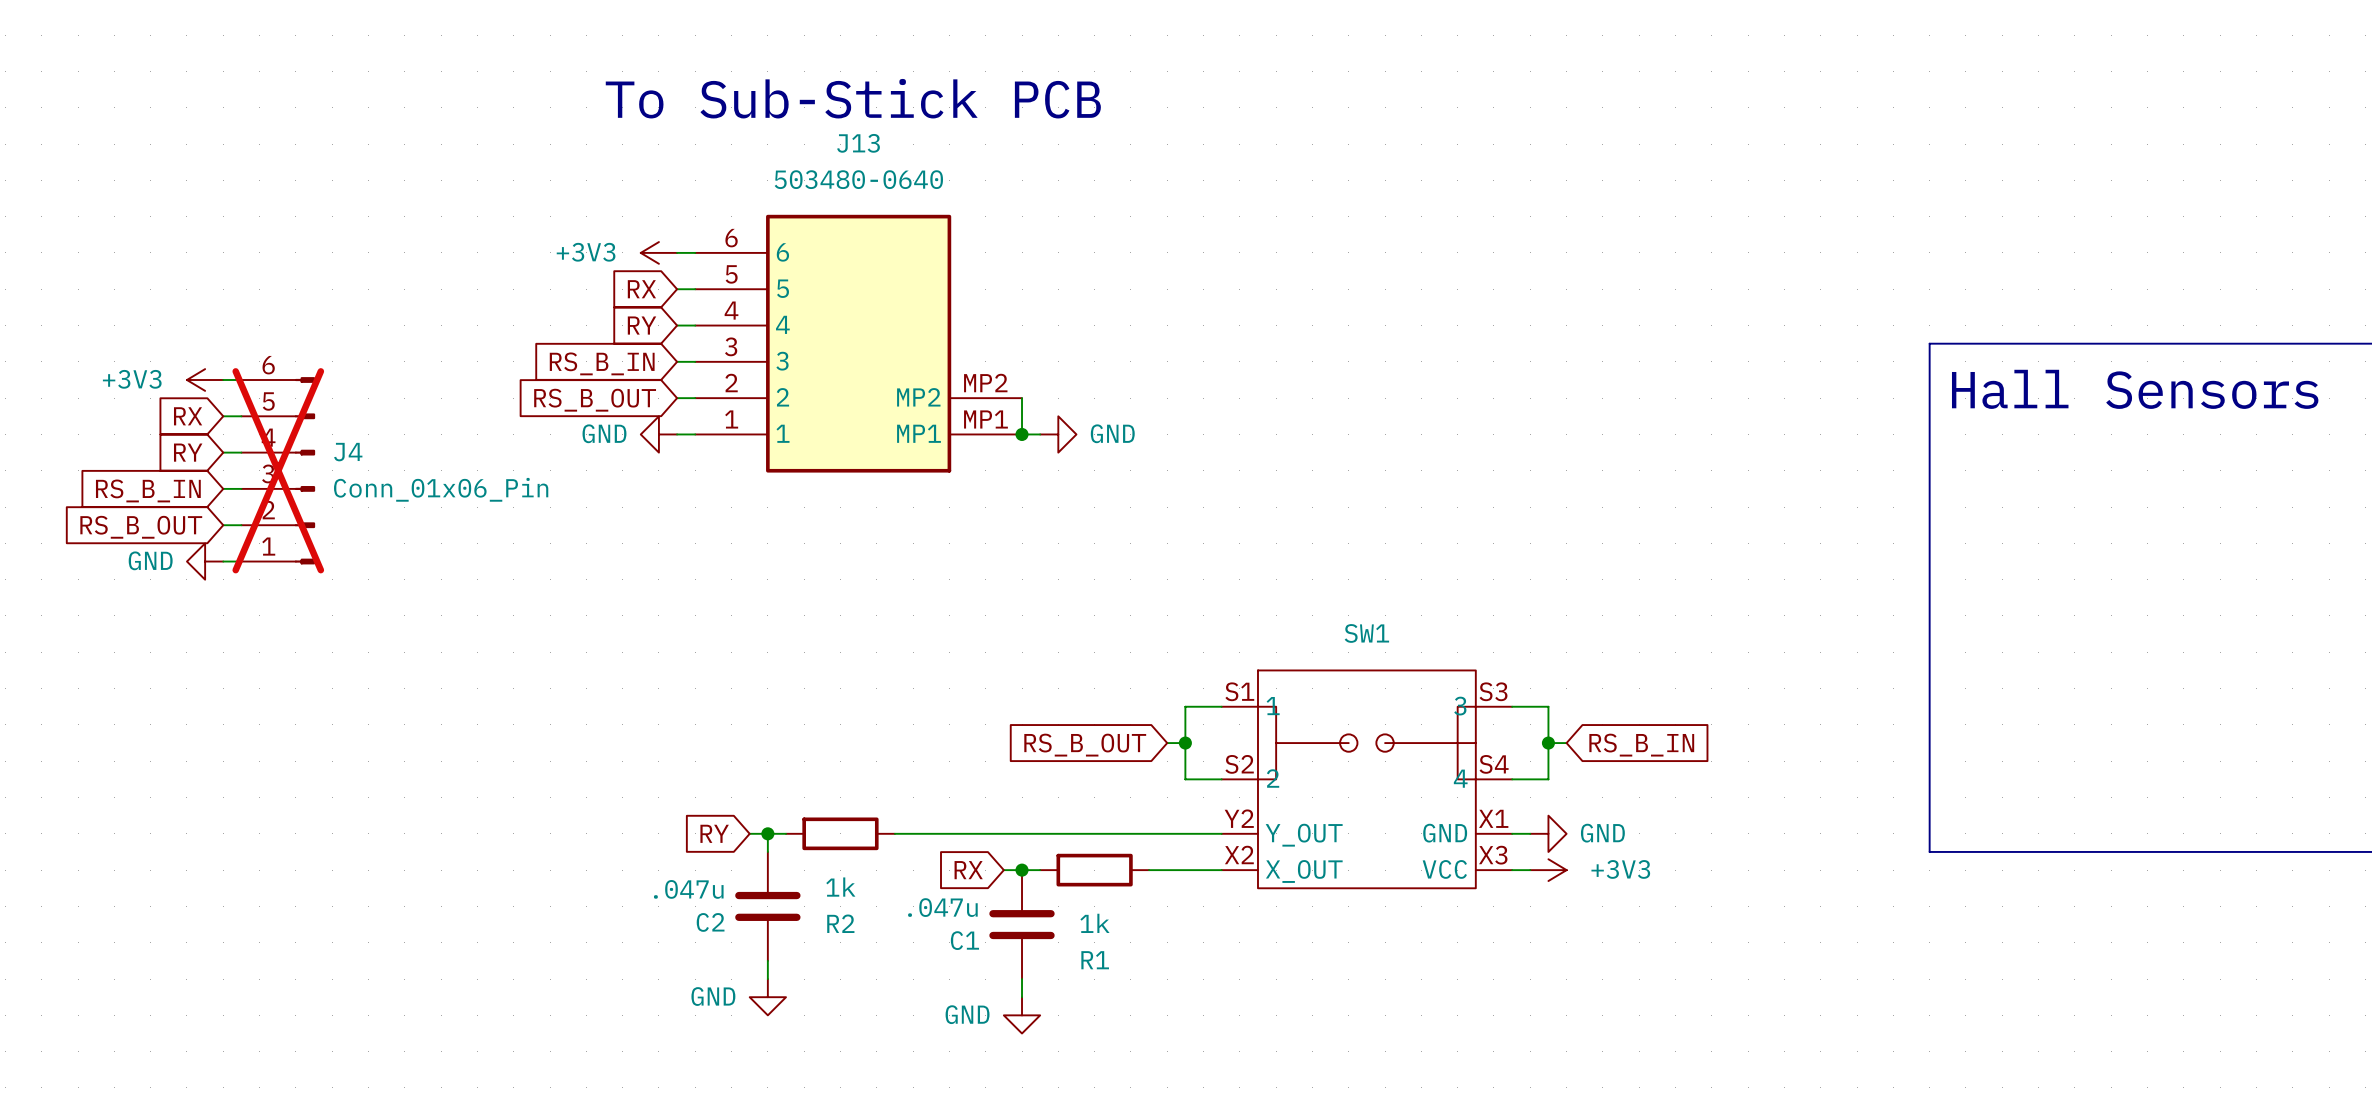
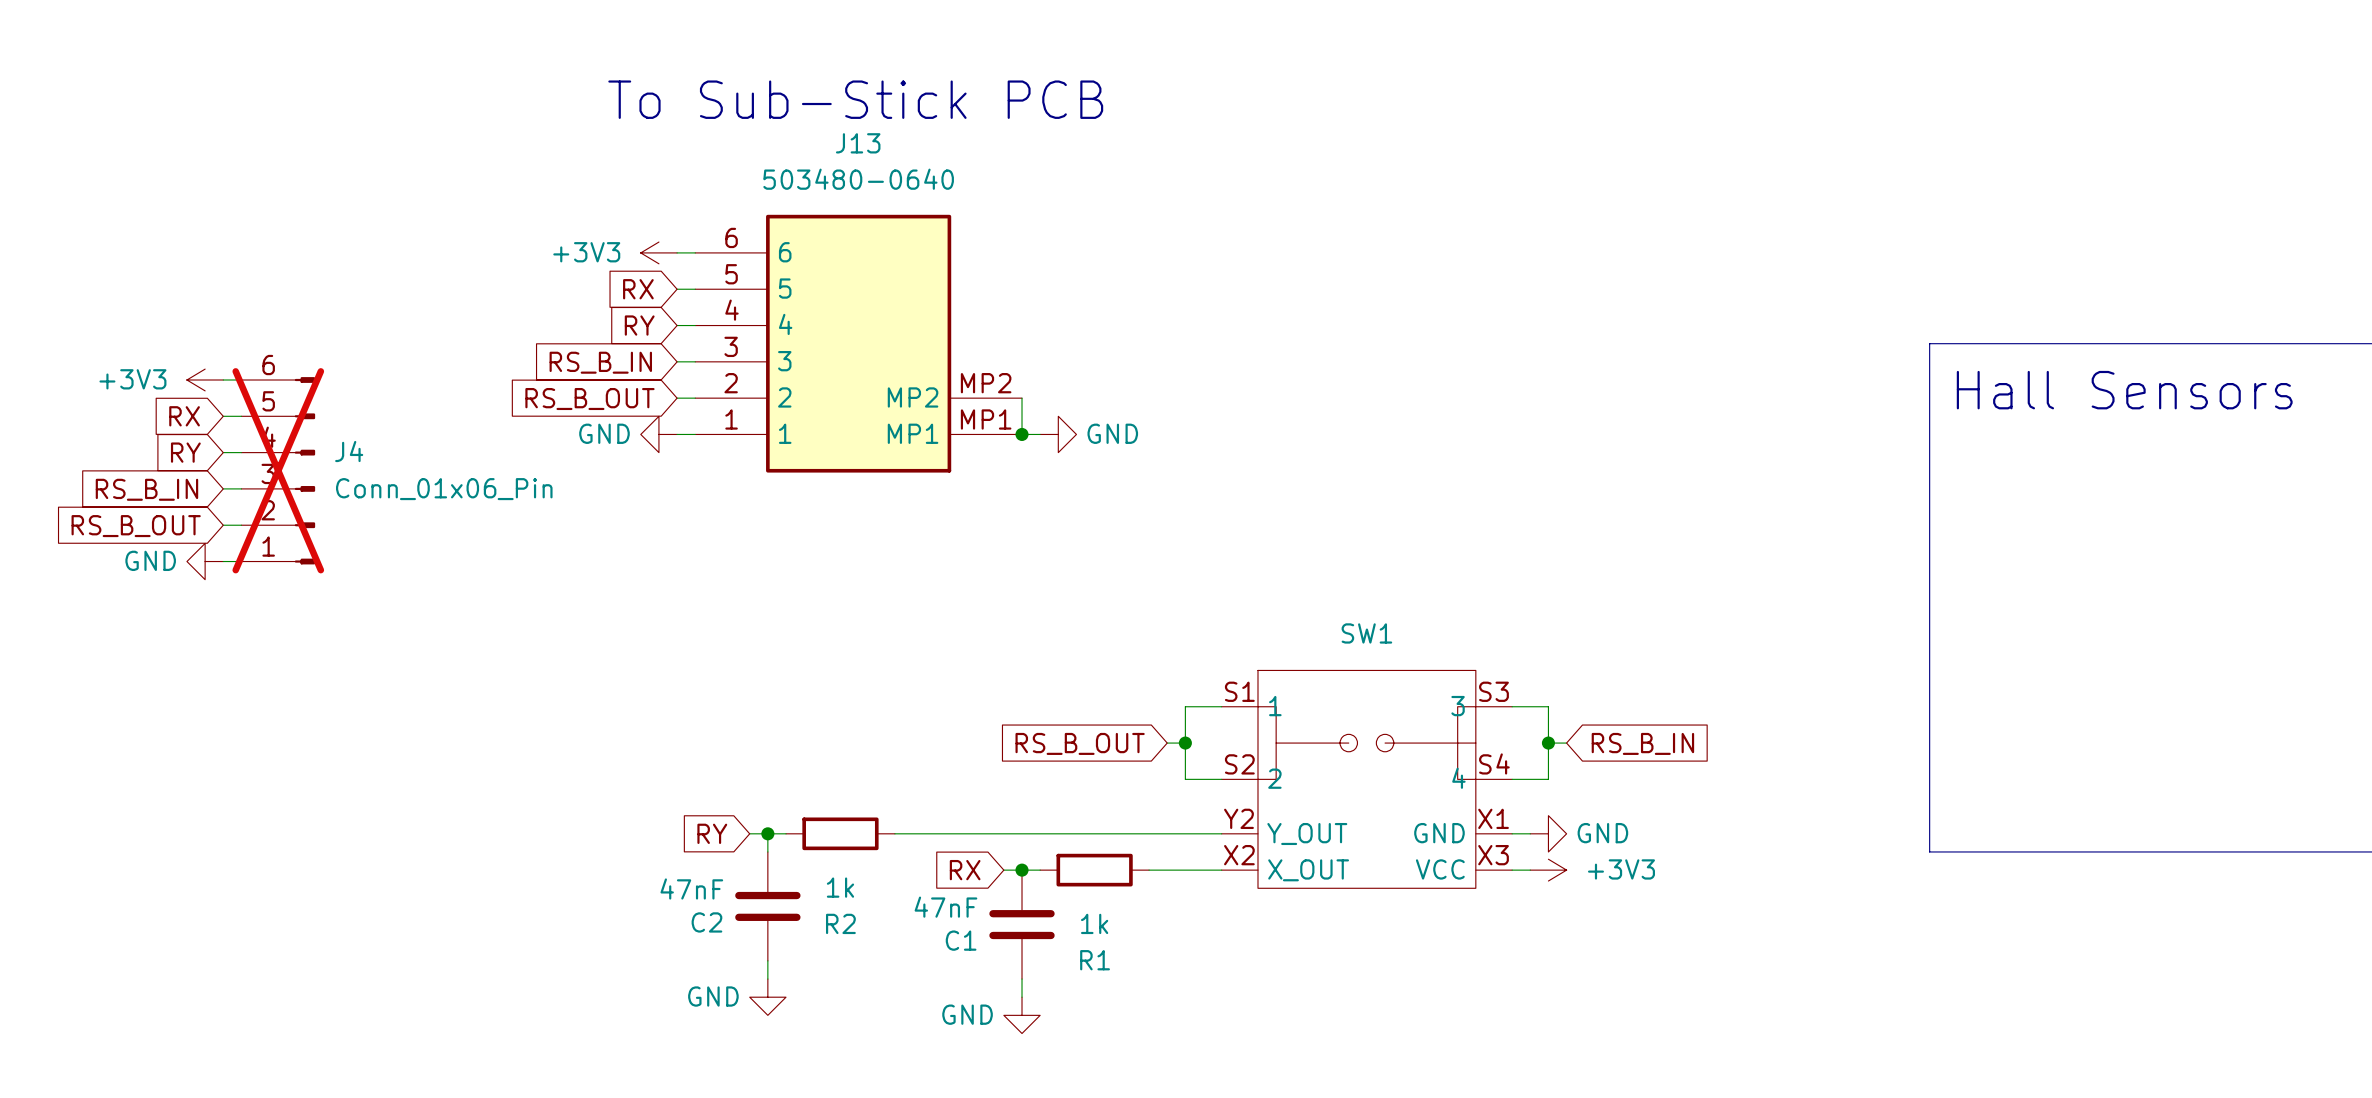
C2 value: .047u (688, 889) -> 47nF (691, 888)
C1 value: .047u (942, 907) -> 47nF (945, 907)

